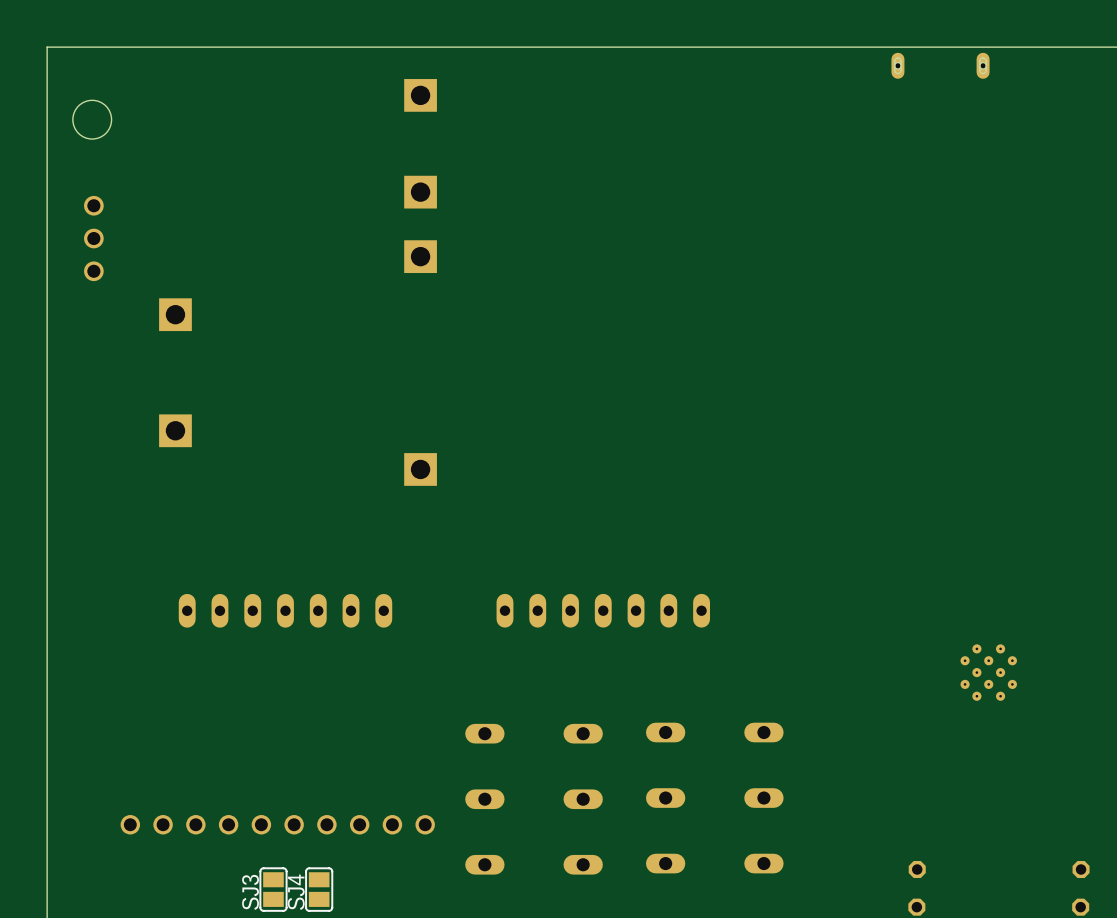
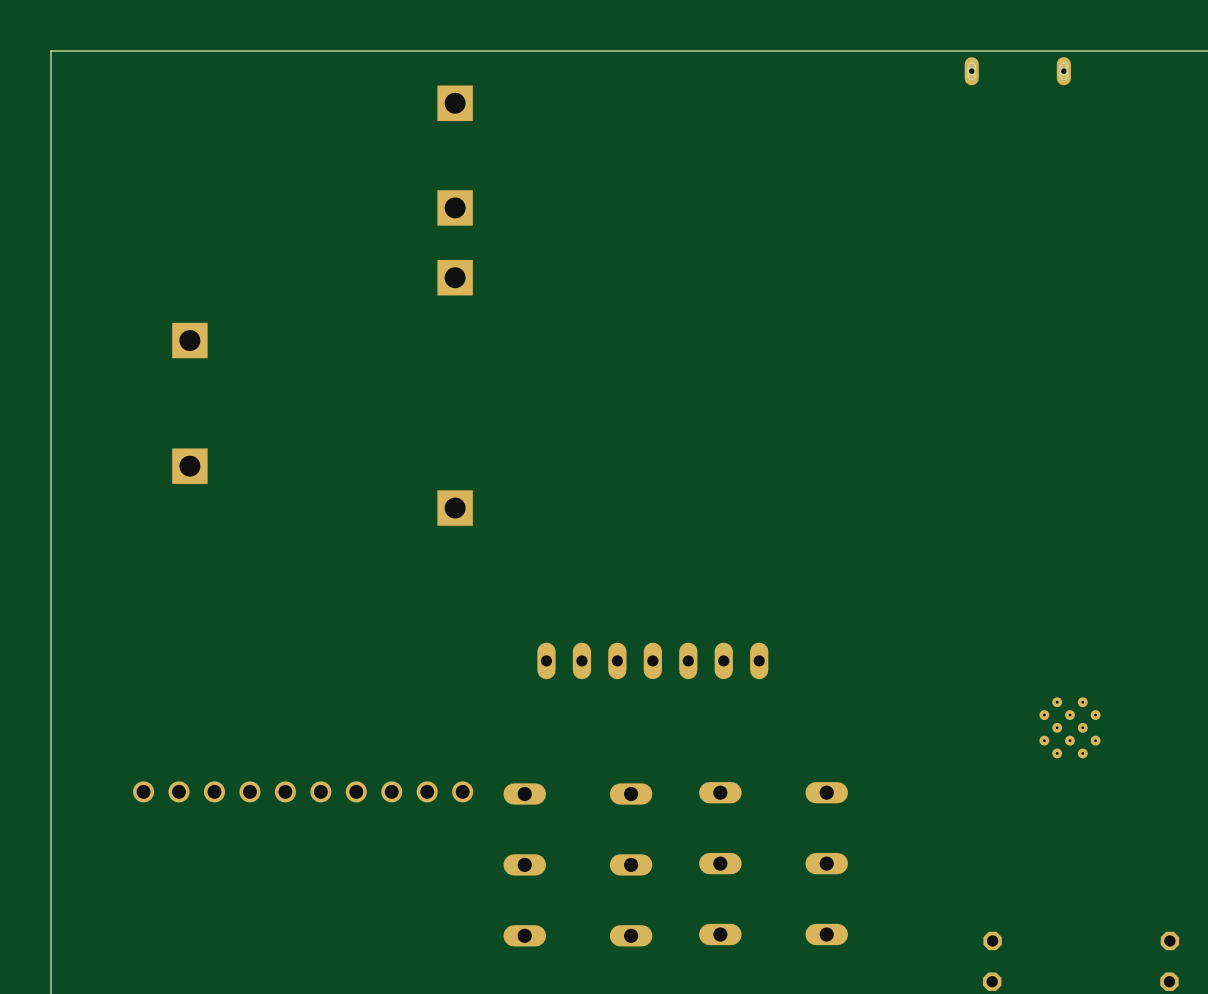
round board edge: [72, 99, 113, 140] -> none
part: (93, 238) -> none
part: (285, 610) -> none
part position: (277, 824) -> (303, 791)
SJ3: (273, 889) -> none
SJ4: (319, 889) -> none

